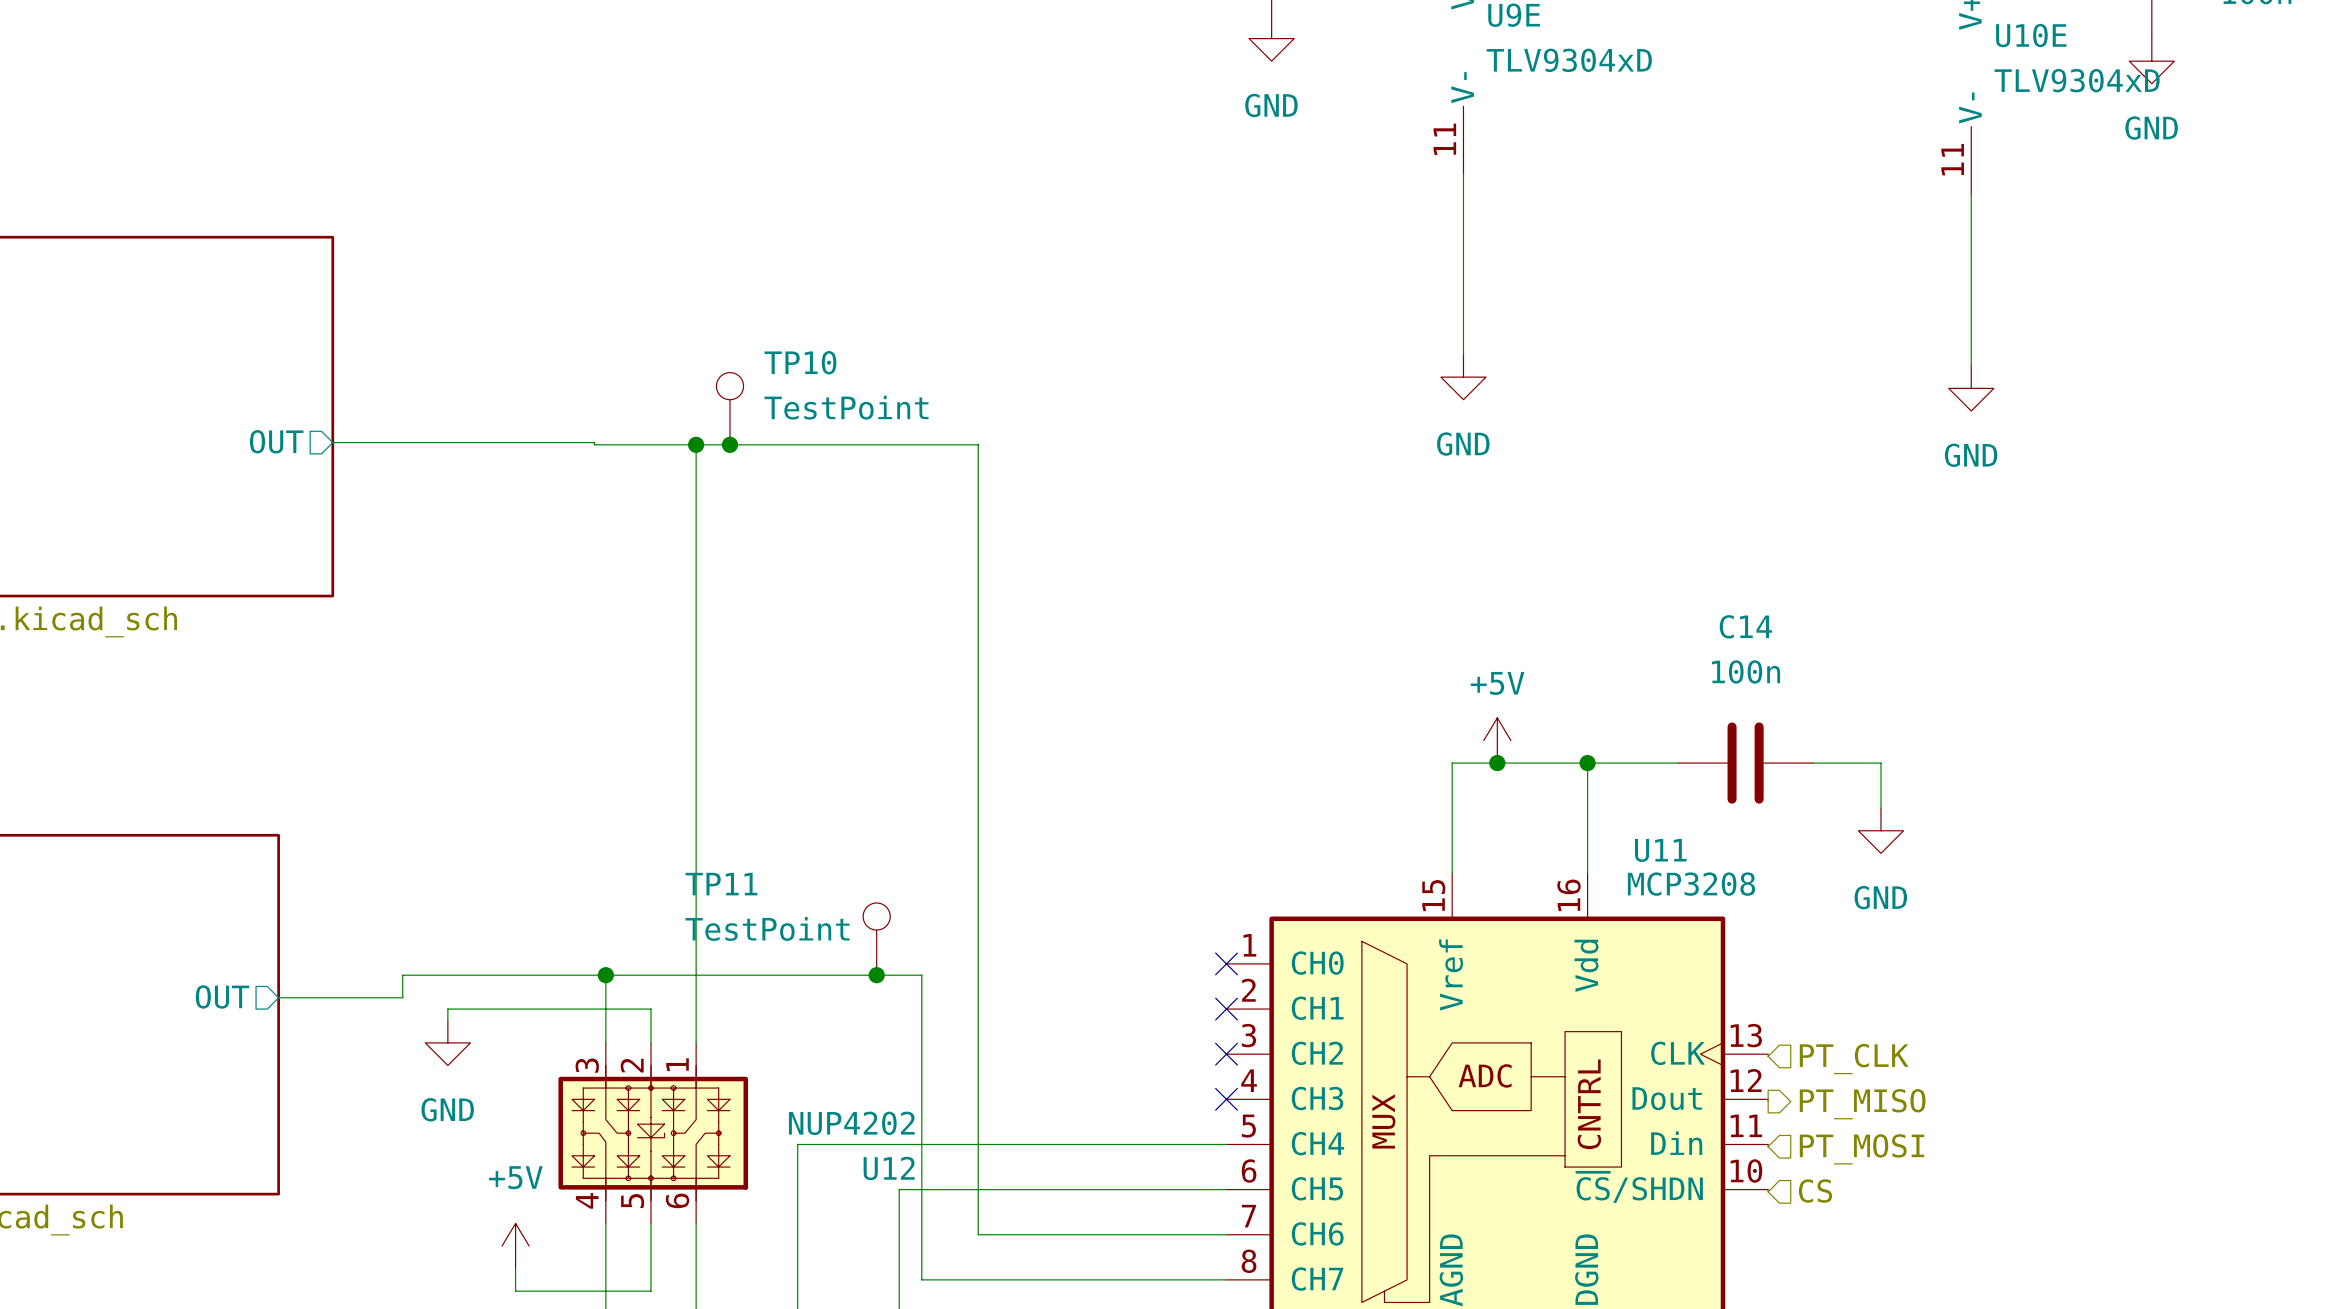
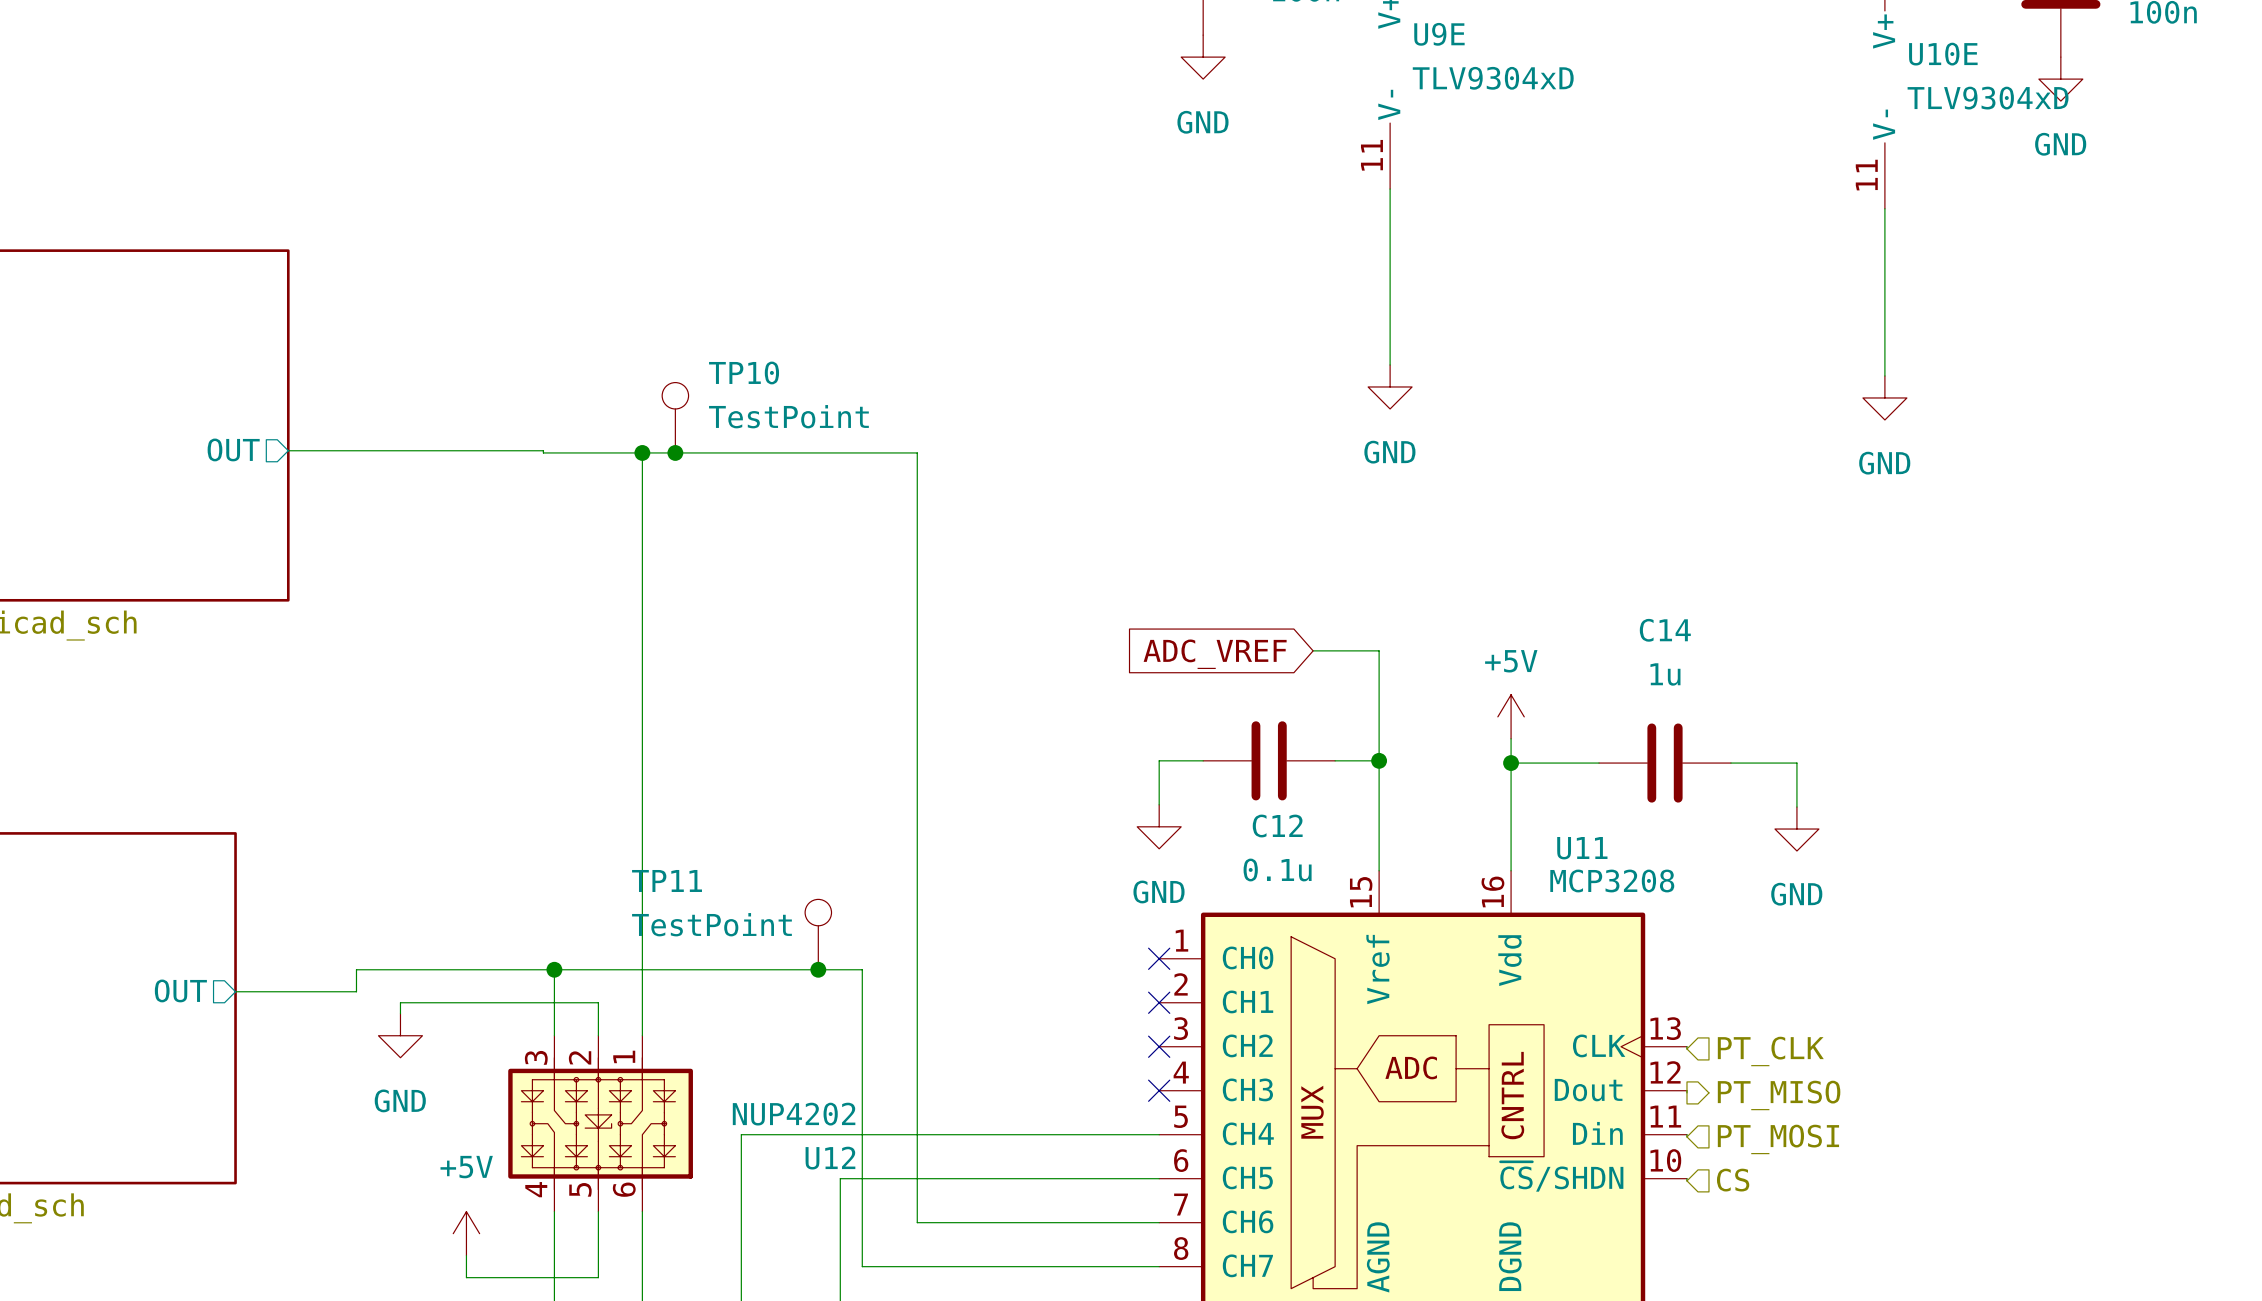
wire: none -> (1313, 650) (1379, 650) (1379, 763)
global label: none -> ADC_VREF (1215, 654)
C14 value: 100n (1746, 671) -> 1u (1665, 674)
power symbol position: +5V (1497, 740) -> +5V (1511, 716)
wire: none -> (1203, 760) (1159, 760) (1159, 804)
C12: none -> 0.1u (1269, 760)
wire: none -> (1335, 760) (1379, 760)
wire: (1452, 763) (1587, 763) -> (1511, 738) (1511, 763)
junction position: (1497, 763) -> (1379, 760)
power symbol: none -> GND (1159, 826)

